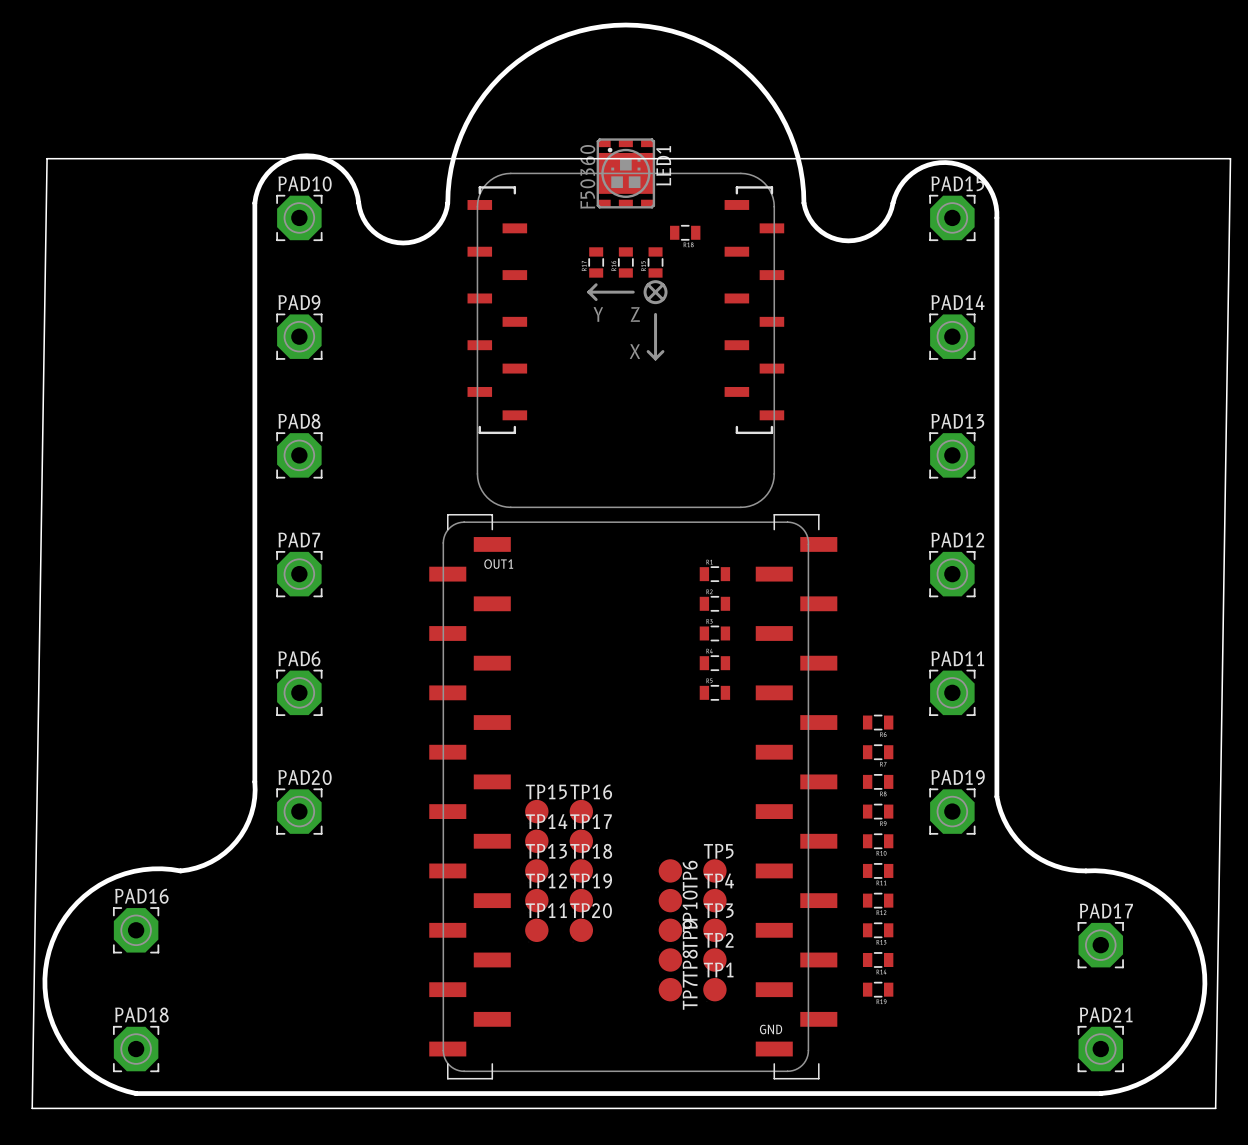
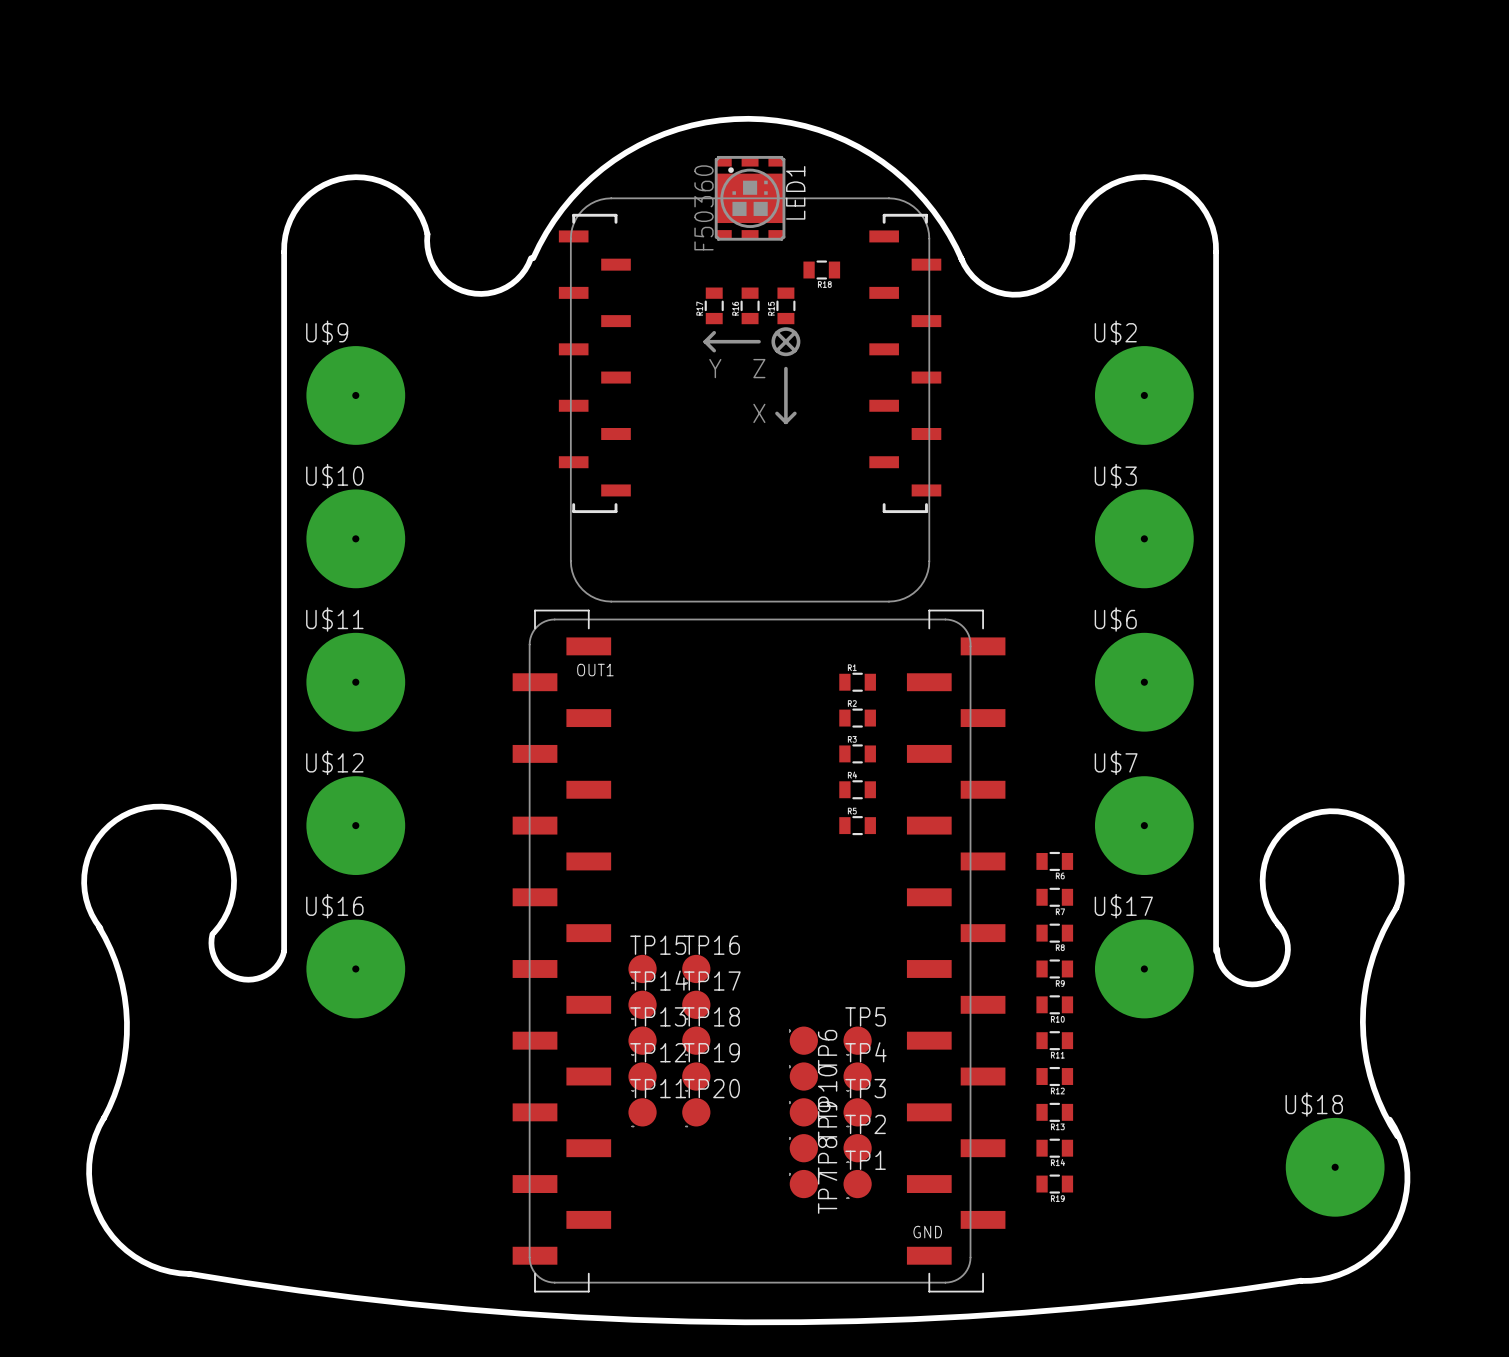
board edge: (47, 158) (1230, 158) (1215, 1108) (32, 1108) (47, 158) -> none
board edge: (254, 203) (255, 789) (253, 805) (248, 821) (241, 835) (230, 847) (218, 857) (204, 865) (188, 869) (143, 869) (116, 876) (99, 885) (84, 896) (65, 917) (55, 933) (49, 950) (45, 969) (45, 997) (49, 1015) (56, 1033) (66, 1049) (78, 1063) (93, 1075) (109, 1084) (136, 1093) (1100, 1093) (1127, 1088) (1144, 1081) (1160, 1071) (1174, 1059) (1185, 1044) (1194, 1028) (1201, 1011) (1204, 993) (1204, 974) (1201, 956) (1196, 939) (1187, 922) (1170, 901) (1155, 889) (1139, 880) (1113, 872) (1062, 868) (1040, 859) (1016, 839) (1007, 826) (998, 804) (996, 796) (996, 211) (992, 194) (978, 175) (963, 166) (951, 163) (939, 162) (922, 167) (907, 177) (900, 186) (887, 219) (875, 231) (854, 240) (831, 237) (817, 228) (807, 214) (803, 203) (800, 168) (790, 134) (773, 104) (751, 77) (724, 55) (694, 38) (660, 28) (637, 25) (614, 25) (579, 31) (547, 43) (517, 61) (491, 85) (471, 114) (457, 145) (451, 168) (446, 208) (443, 218) (433, 231) (424, 237) (403, 243) (387, 240) (377, 234) (363, 218) (355, 190) (350, 179) (336, 165) (319, 157) (306, 155) (294, 157) (276, 165) (267, 173) (260, 184) (254, 203) -> none
PAD10: (299, 217) -> none
PAD15: (952, 217) -> none
board edge: none -> (531, 258) (521, 275) (511, 283) (500, 290) (487, 293) (474, 293) (456, 288) (445, 280) (433, 265) (428, 253) (425, 226) (413, 204) (401, 192) (387, 184) (364, 177) (339, 179) (316, 189) (298, 205) (287, 227) (284, 252) (284, 951)
board edge: none -> (533, 258) (554, 220) (571, 198) (602, 168) (626, 152) (651, 139) (678, 129) (719, 120) (748, 118) (777, 120) (818, 130) (845, 140) (882, 161) (904, 179) (924, 200) (941, 222) (962, 260)
board edge: none -> (961, 258) (973, 276) (990, 289) (1012, 294) (1027, 293) (1041, 288) (1053, 280) (1066, 262) (1071, 248) (1074, 226) (1086, 204) (1098, 192) (1112, 184) (1136, 177) (1160, 179) (1183, 188) (1201, 205) (1212, 227) (1216, 252) (1216, 951)
PAD9: (299, 336) -> none
U$9: none -> (355, 395)
PAD14: (952, 336) -> none
U$2: none -> (1144, 395)
PAD8: (299, 455) -> none
U$10: none -> (355, 538)
PAD13: (952, 455) -> none
U$3: none -> (1144, 538)
PAD7: (299, 574) -> none
U$11: none -> (355, 682)
PAD12: (952, 574) -> none
U$6: none -> (1144, 682)
PAD6: (299, 692) -> none
U$12: none -> (355, 825)
PAD11: (952, 692) -> none
U$7: none -> (1144, 825)
board edge: none -> (1396, 907) (1401, 883) (1400, 867) (1395, 851) (1387, 837) (1375, 826) (1361, 817) (1346, 812) (1321, 811) (1305, 816) (1291, 824) (1274, 841) (1267, 856) (1263, 872) (1264, 896) (1270, 912) (1279, 925)
board edge: none -> (1396, 907) (1383, 931) (1373, 956) (1364, 995) (1362, 1022) (1366, 1062) (1373, 1088) (1384, 1112) (1397, 1136)
board edge: none -> (1278, 924) (1286, 940) (1286, 958) (1280, 971) (1265, 981) (1247, 984) (1234, 979) (1221, 966) (1217, 949)
board edge: none -> (99, 927) (110, 949) (119, 972) (124, 997) (126, 1022) (125, 1047) (121, 1071) (114, 1095) (103, 1118)
board edge: none -> (100, 928) (88, 907) (84, 891) (85, 867) (90, 851) (103, 831) (115, 820) (137, 809) (161, 806) (177, 809) (200, 818) (218, 835) (226, 849) (233, 872) (233, 888) (227, 912) (214, 932)
board edge: none -> (212, 934) (211, 947) (218, 963) (227, 973) (239, 978) (252, 979) (269, 973) (278, 963) (284, 951)
PAD20: (299, 811) -> none
U$16: none -> (355, 968)
PAD19: (952, 811) -> none
U$17: none -> (1144, 968)
PAD16: (136, 930) -> none
board edge: none -> (103, 1118) (92, 1144) (89, 1173) (94, 1202) (101, 1220) (112, 1236) (134, 1256) (160, 1269) (189, 1274)
board edge: none -> (1389, 1119) (1402, 1144) (1407, 1172) (1404, 1200) (1394, 1227) (1378, 1249) (1355, 1267) (1329, 1277) (1301, 1280)
PAD17: (1100, 945) -> none
U$18: none -> (1335, 1167)
PAD18: (136, 1049) -> none
PAD21: (1100, 1049) -> none
board edge: none -> (189, 1273) (354, 1297) (466, 1309) (633, 1319) (744, 1322) (856, 1321) (1023, 1312) (1190, 1296) (1301, 1280)

